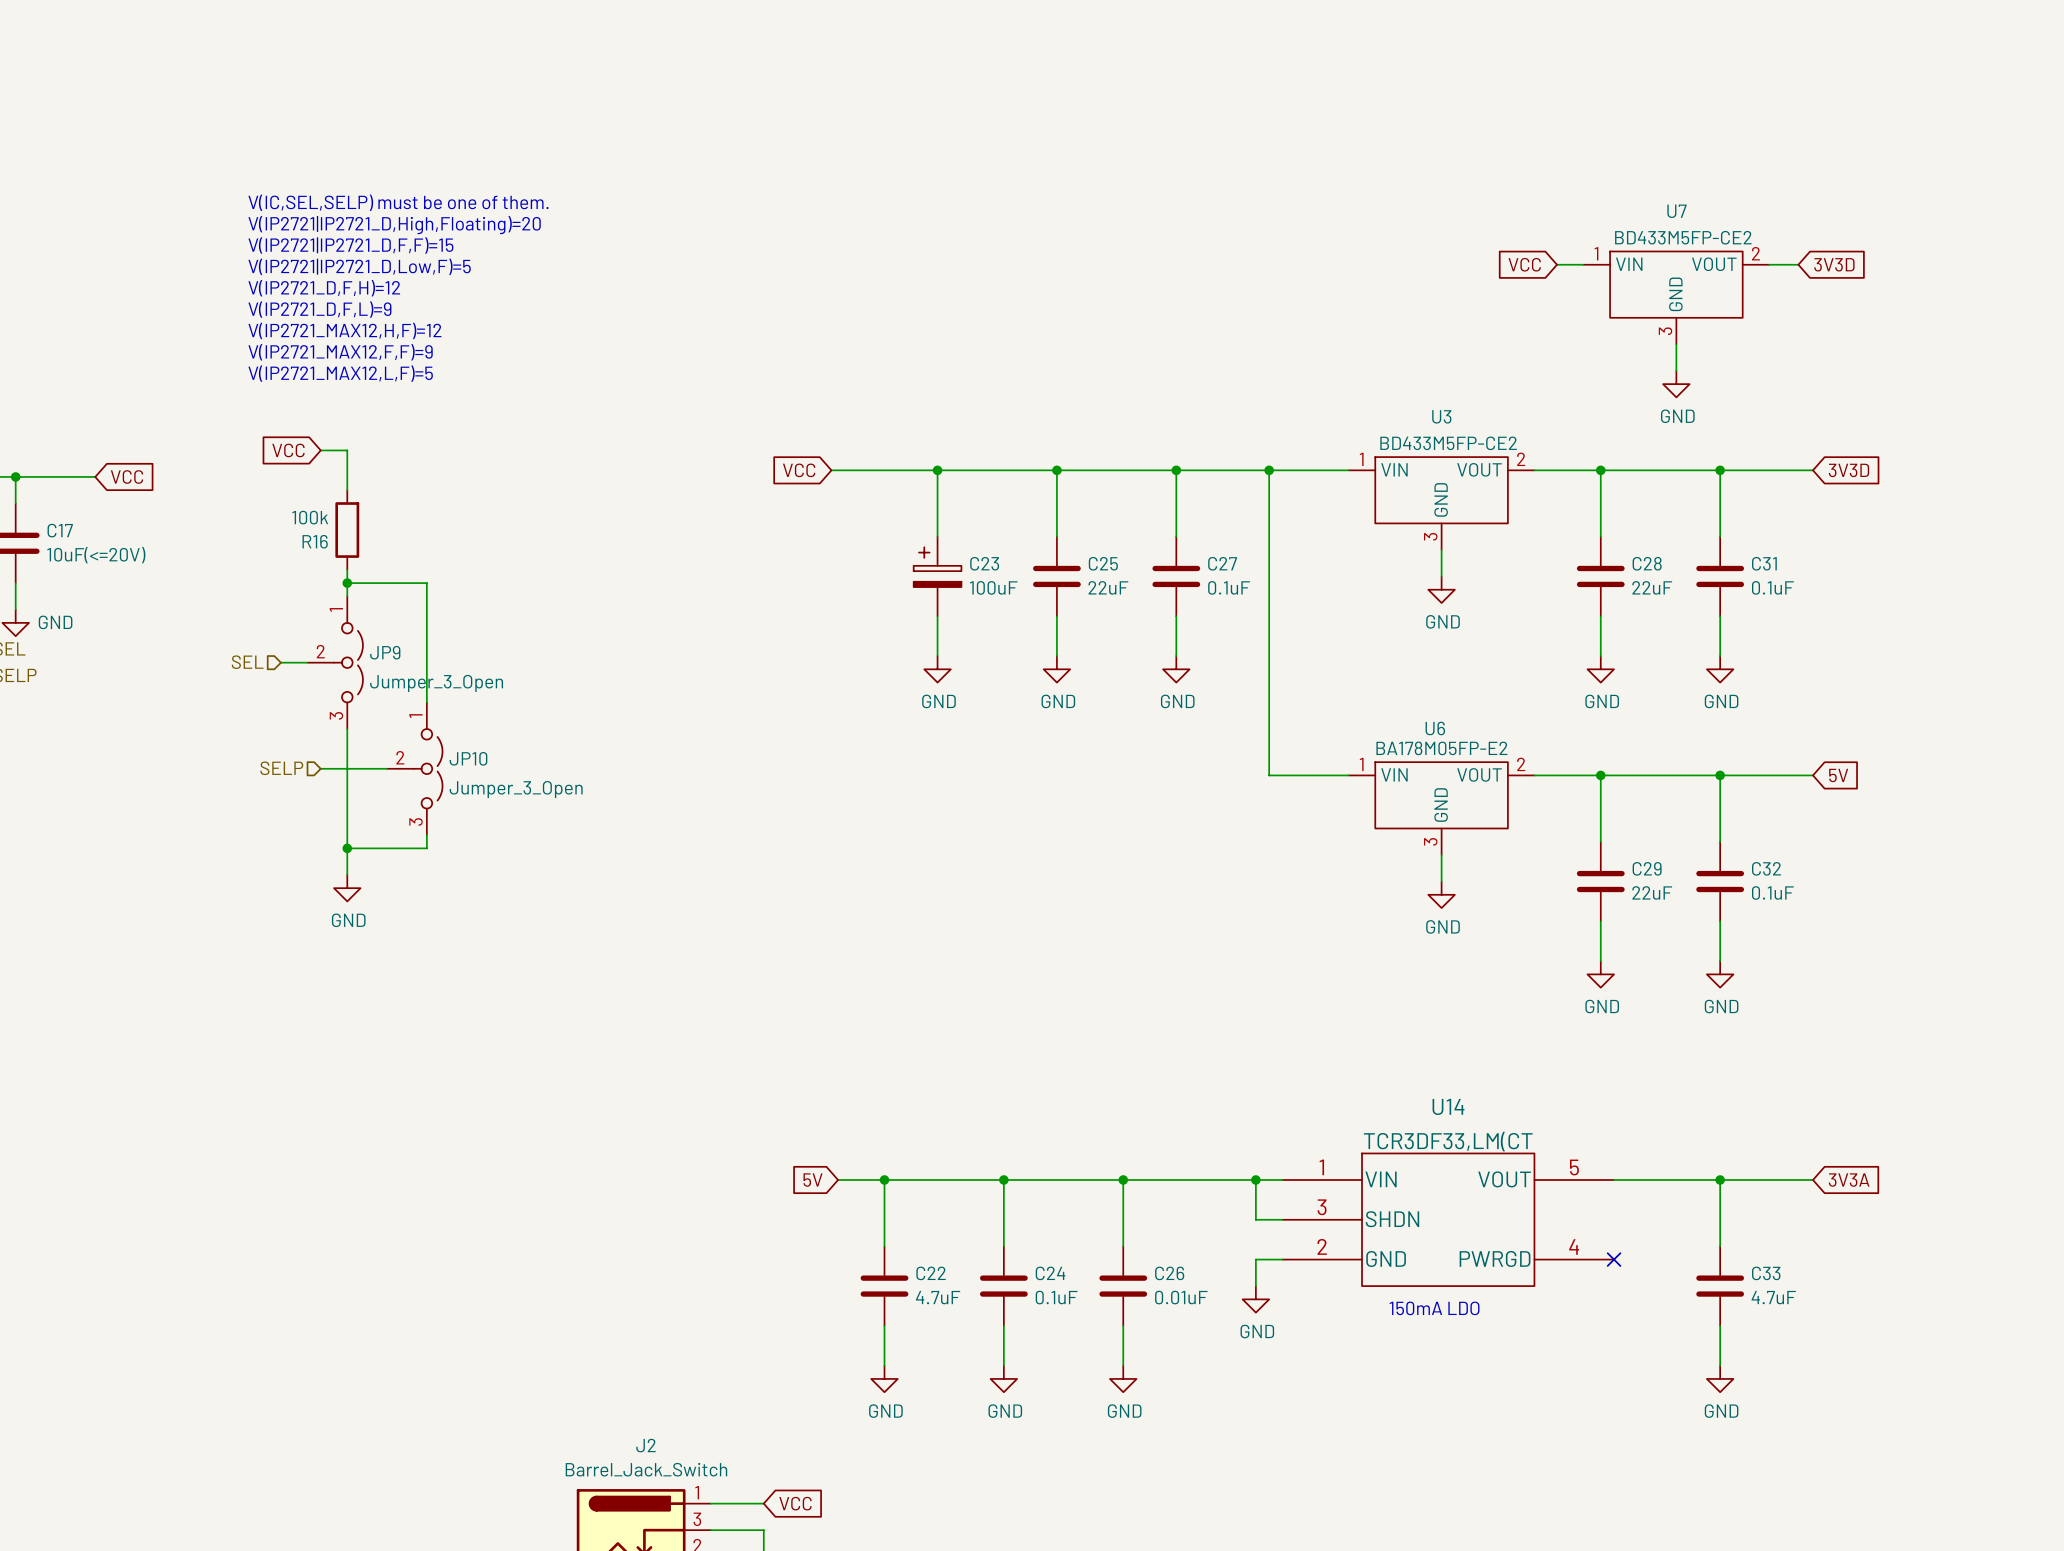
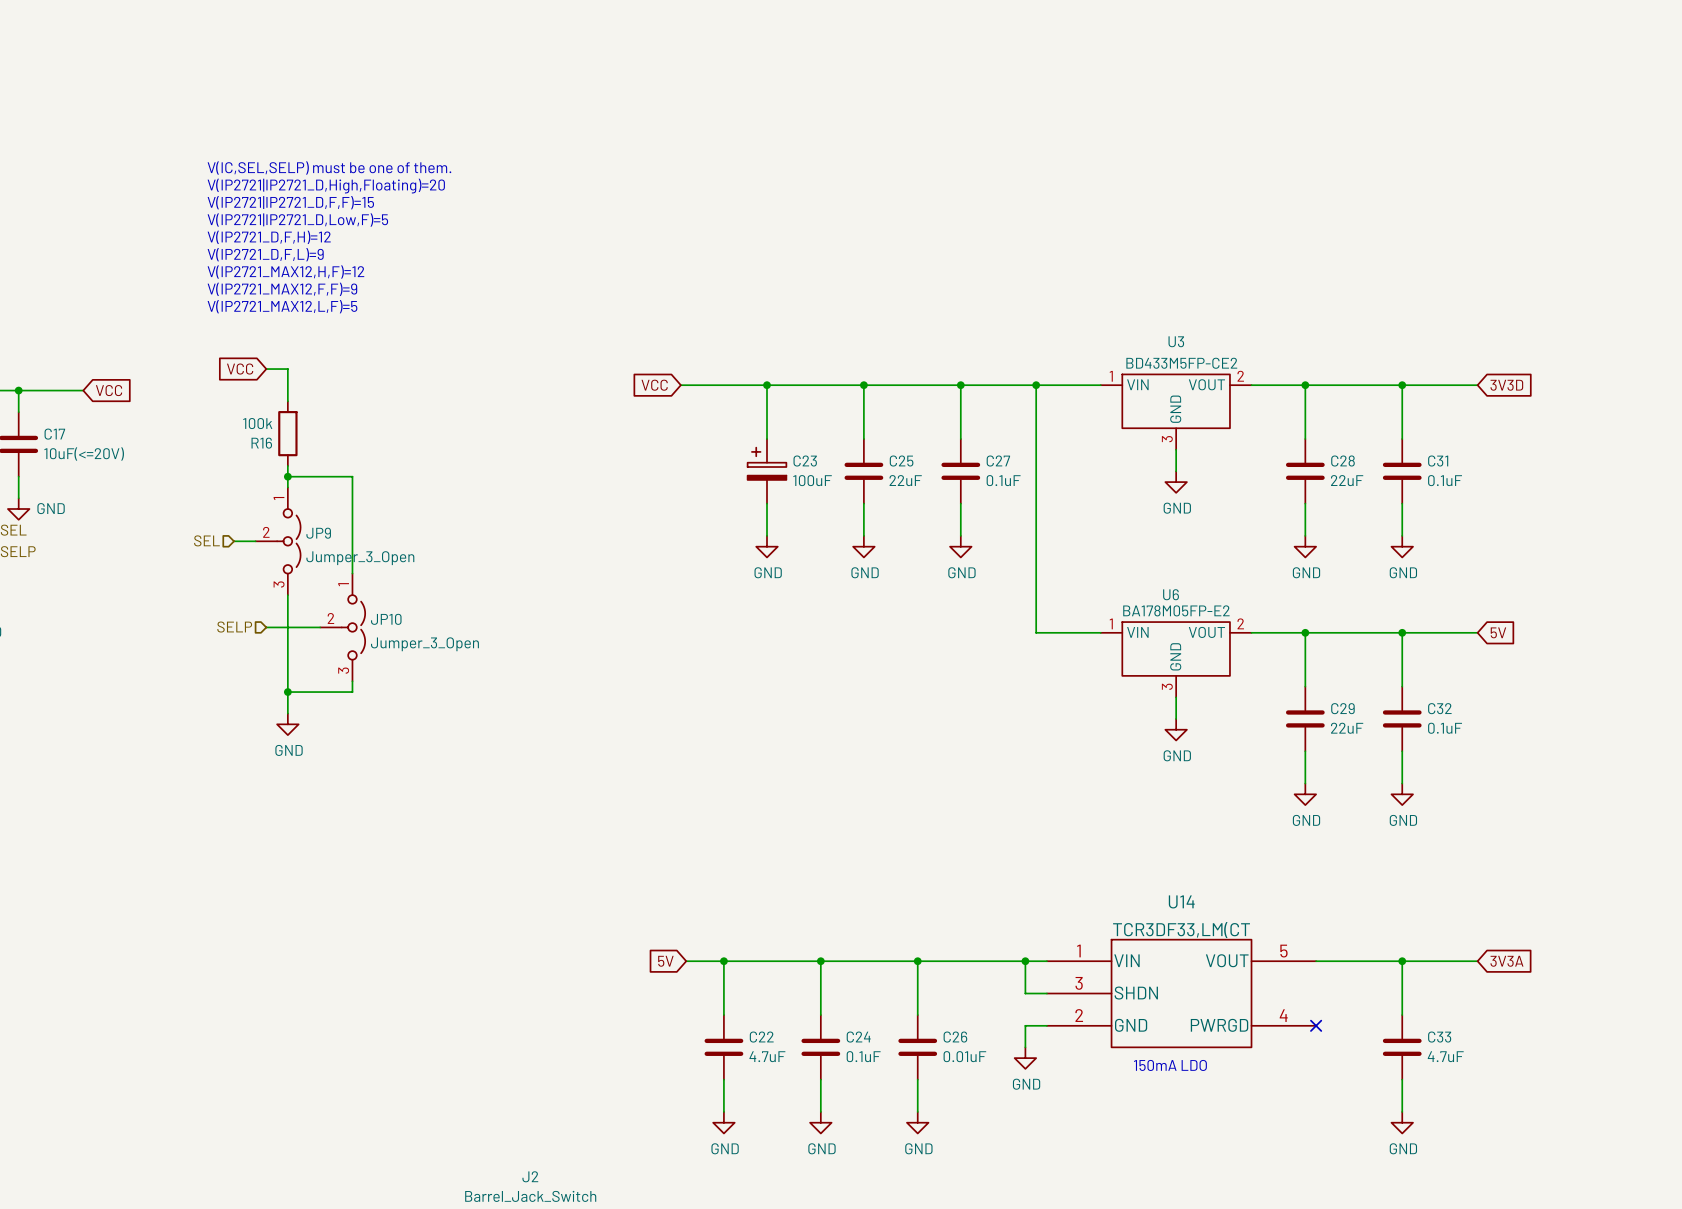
U7: BD433M5FP-CE2 (1802, 178) -> none
global label: VCC (1524, 264) -> none
wire: (1556, 264) (1583, 264) -> none
wire: (1769, 264) (1798, 264) -> none
global label: 3V3D (1834, 264) -> none
wire: (1676, 344) (1676, 370) -> none
power symbol: GND (1676, 384) -> none

